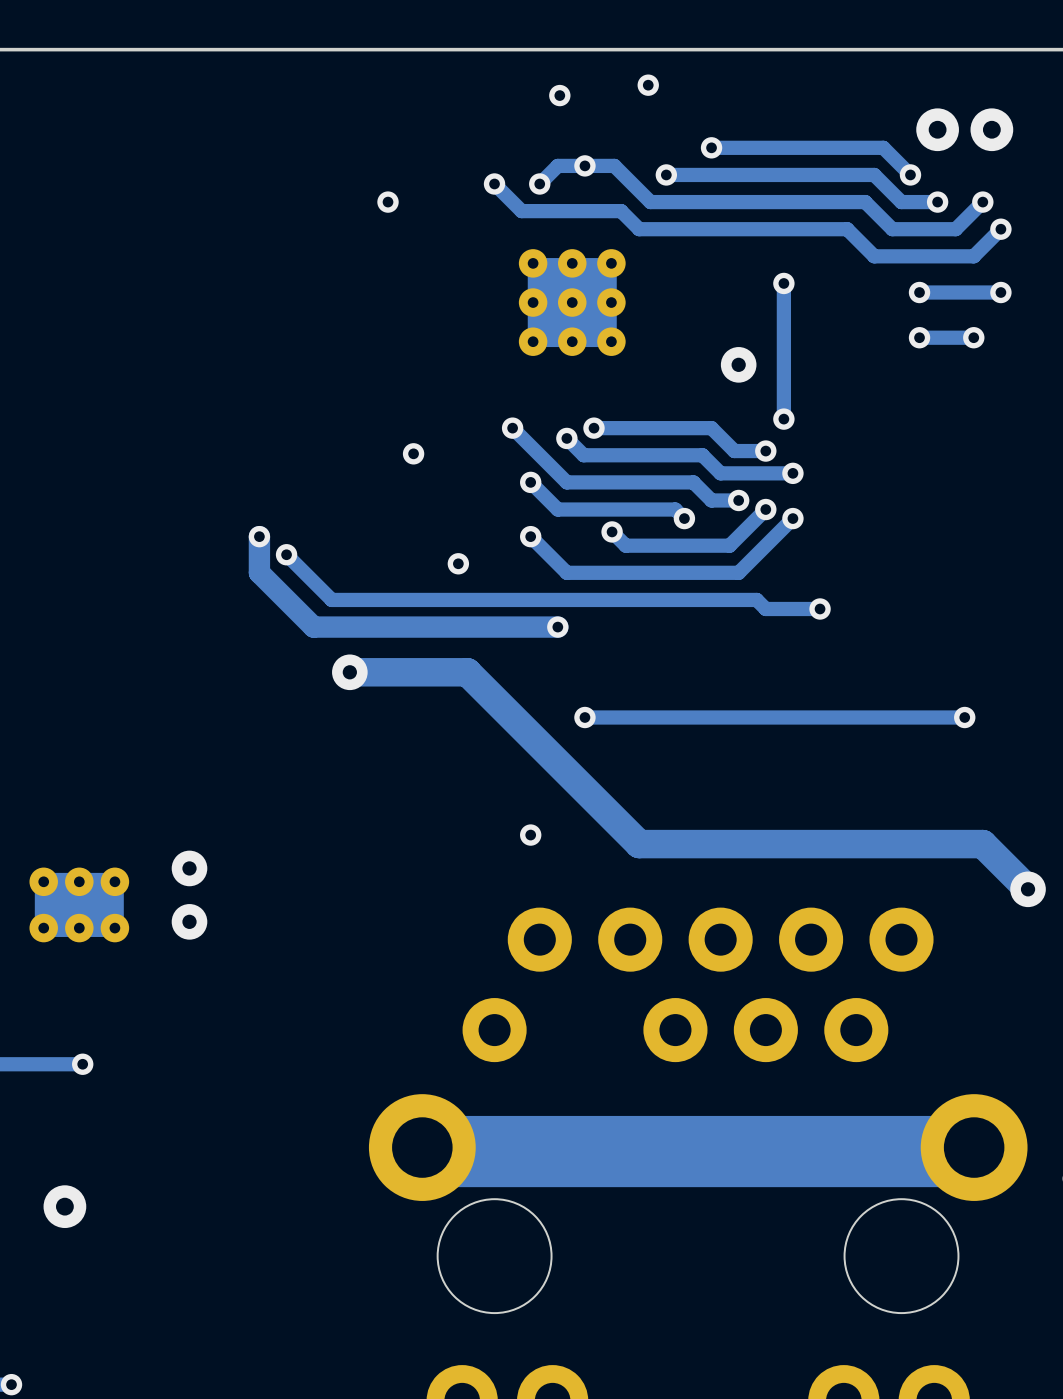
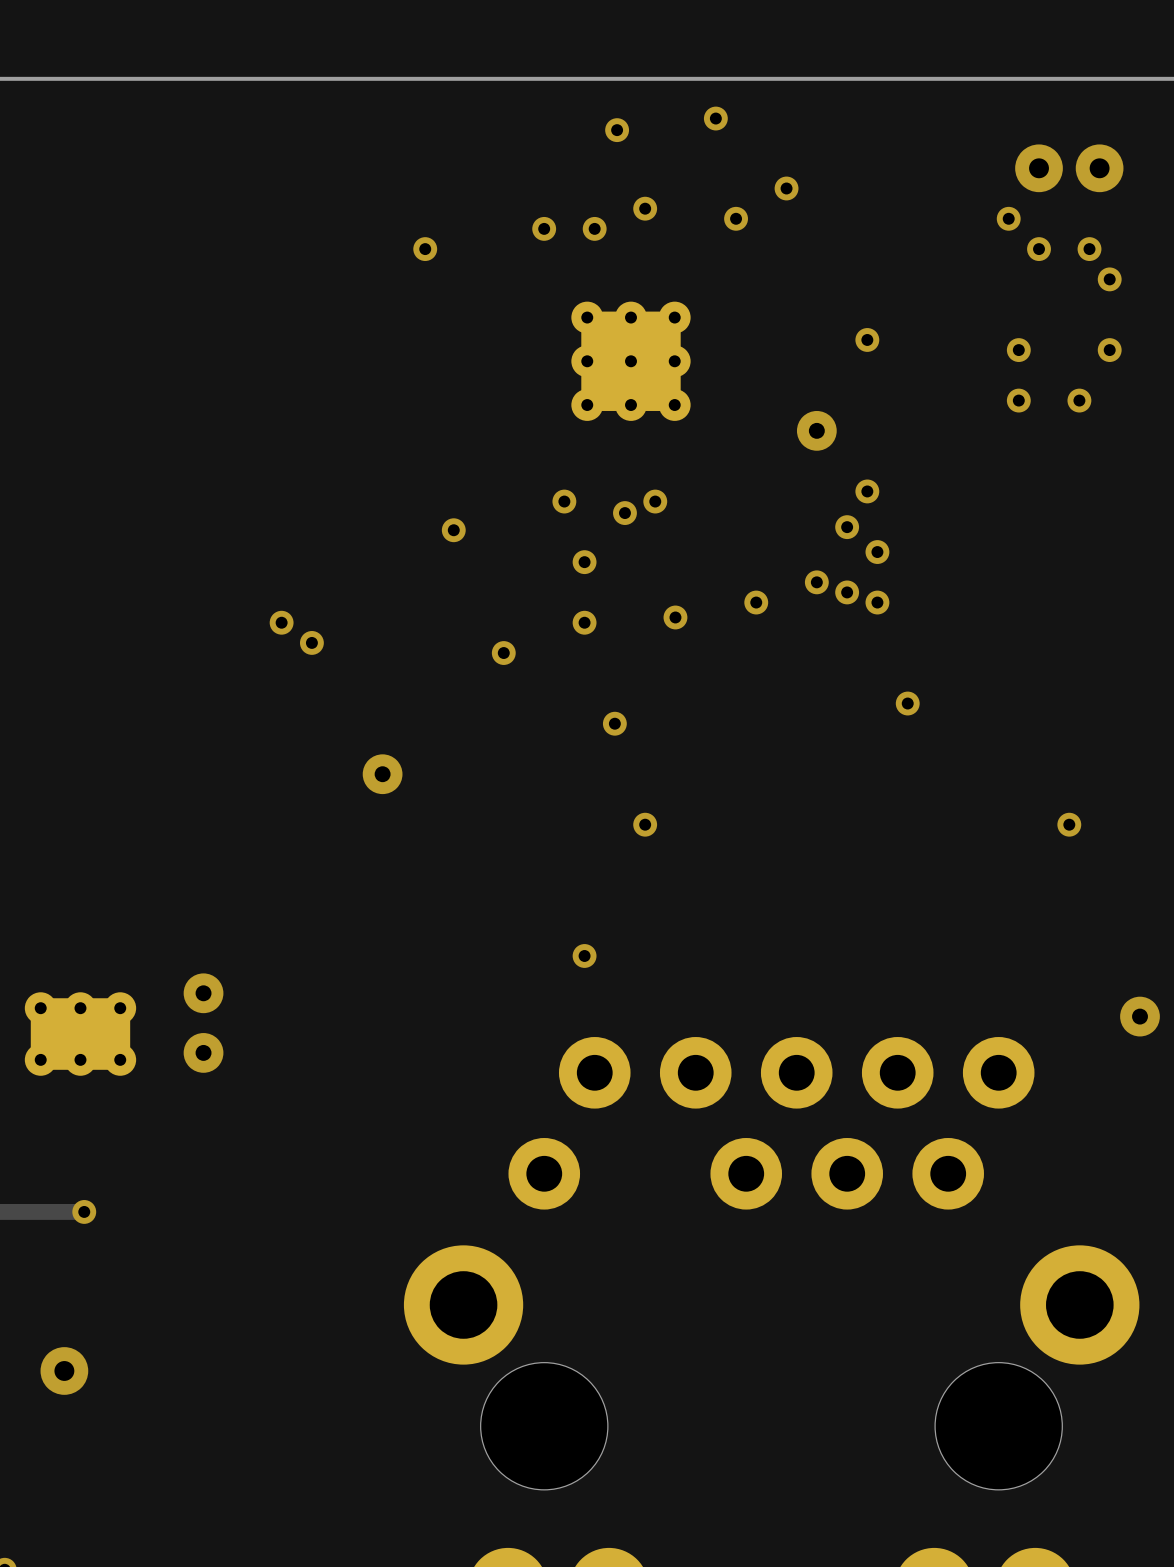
track: (711, 147) (883, 147) (910, 174) -> none
track: (666, 174) (874, 174) (901, 202) (937, 202) -> none
track: (494, 183) (521, 211) (621, 211) (639, 229) (847, 229) (874, 256) (973, 256) (1000, 229) -> none
track: (539, 183) (557, 165) (614, 165) (650, 202) (865, 202) (892, 229) (955, 229) (982, 202) -> none
track: (783, 283) (783, 419) -> none
track: (1000, 292) (919, 292) -> none
track: (973, 337) (919, 337) -> none
track: (512, 428) (566, 482) (693, 482) (711, 500) (738, 500) -> none
track: (593, 428) (711, 428) (734, 451) (765, 451) -> none
track: (566, 438) (583, 455) (702, 455) (720, 473) (792, 473) -> none
track: (530, 482) (557, 509) (675, 509) (684, 518) -> none
track: (765, 509) (729, 545) (625, 545) (612, 531) -> none
track: (792, 518) (738, 572) (566, 572) (530, 536) -> none
track: (259, 536) (259, 572) (313, 627) (557, 627) -> none
track: (286, 554) (331, 599) (756, 599) (765, 608) (820, 608) -> none
track: (349, 672) (467, 672) (639, 844) (982, 844) (1028, 889) -> none
track: (964, 717) (584, 717) -> none
track: (974, 1151) (422, 1151) -> none

